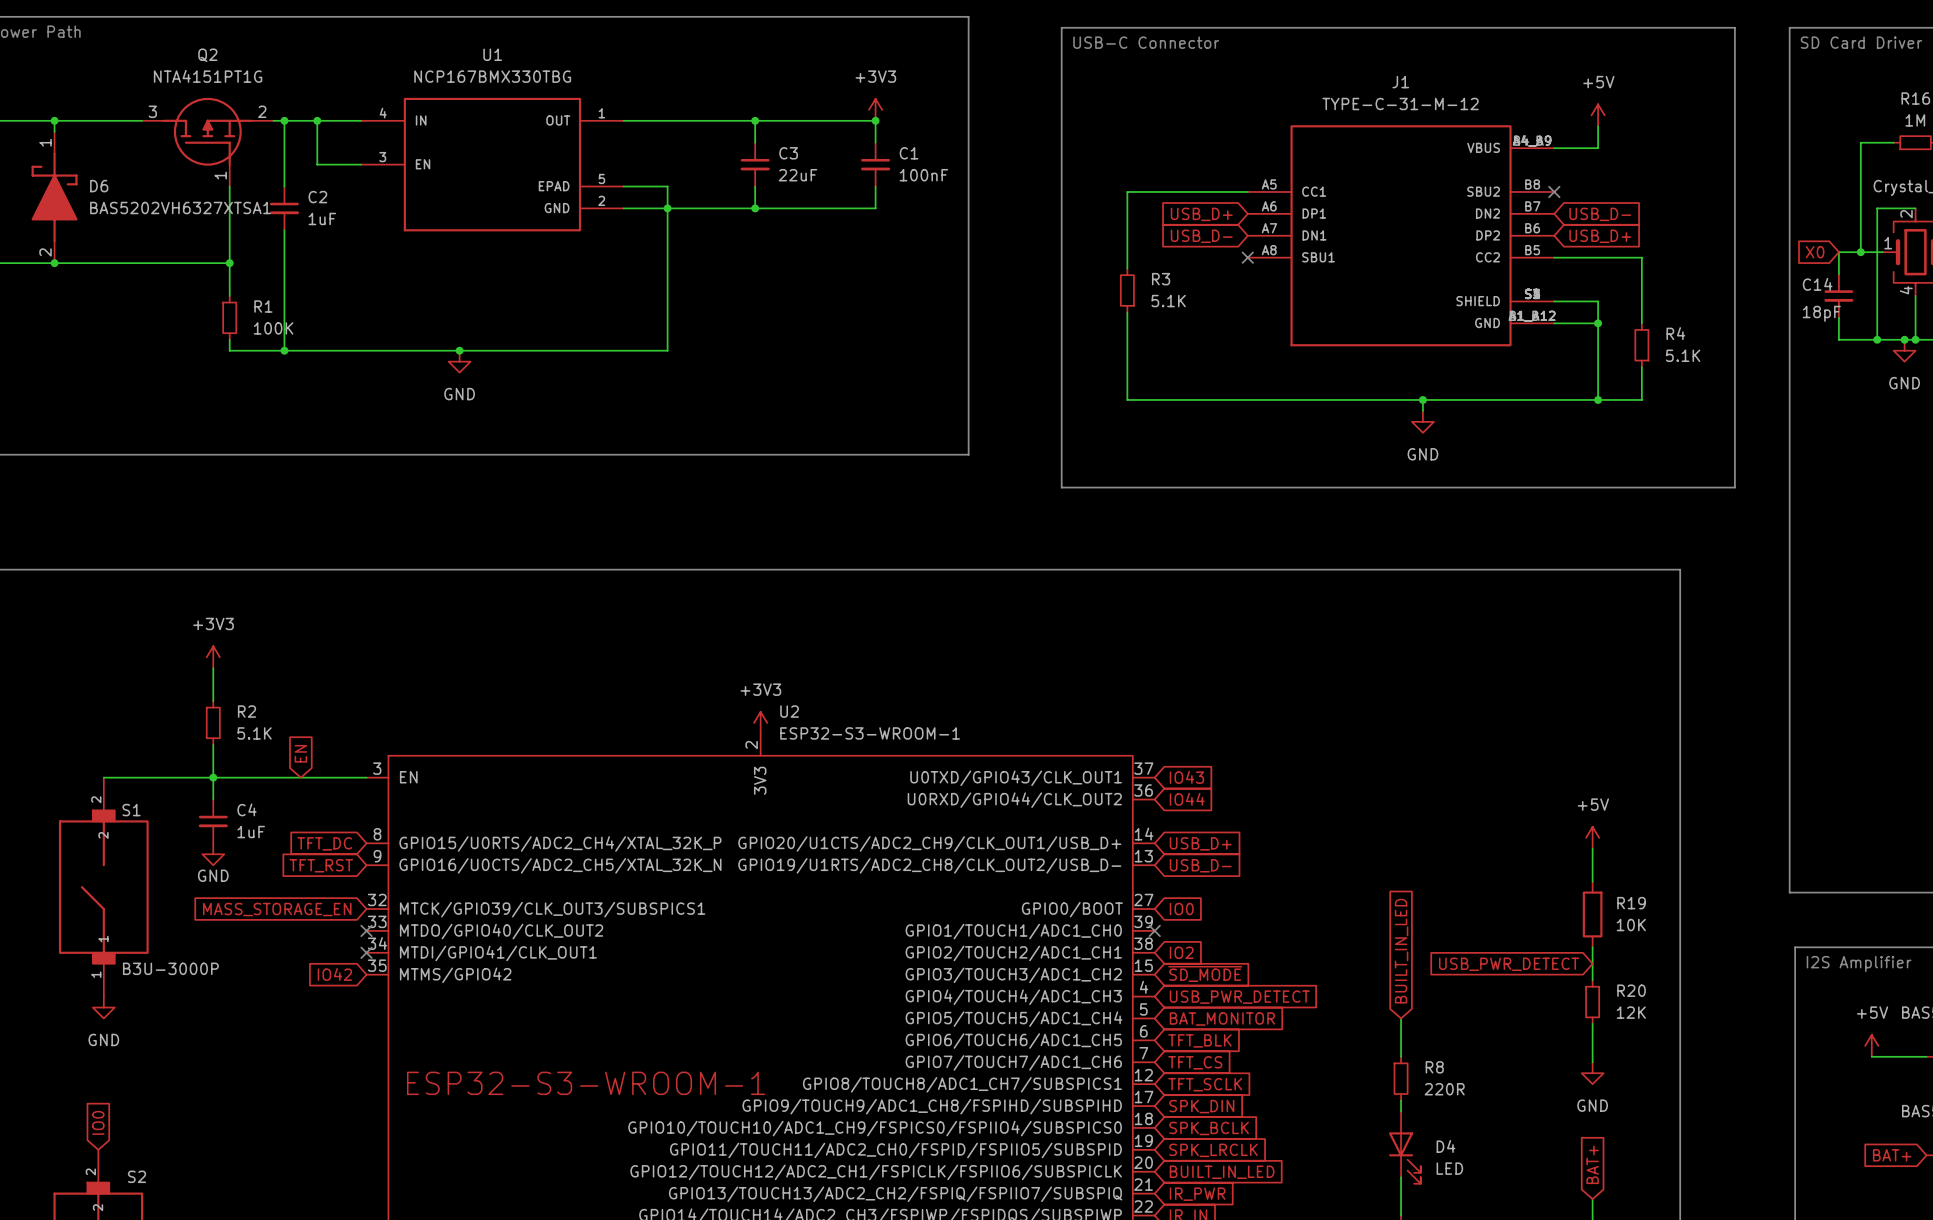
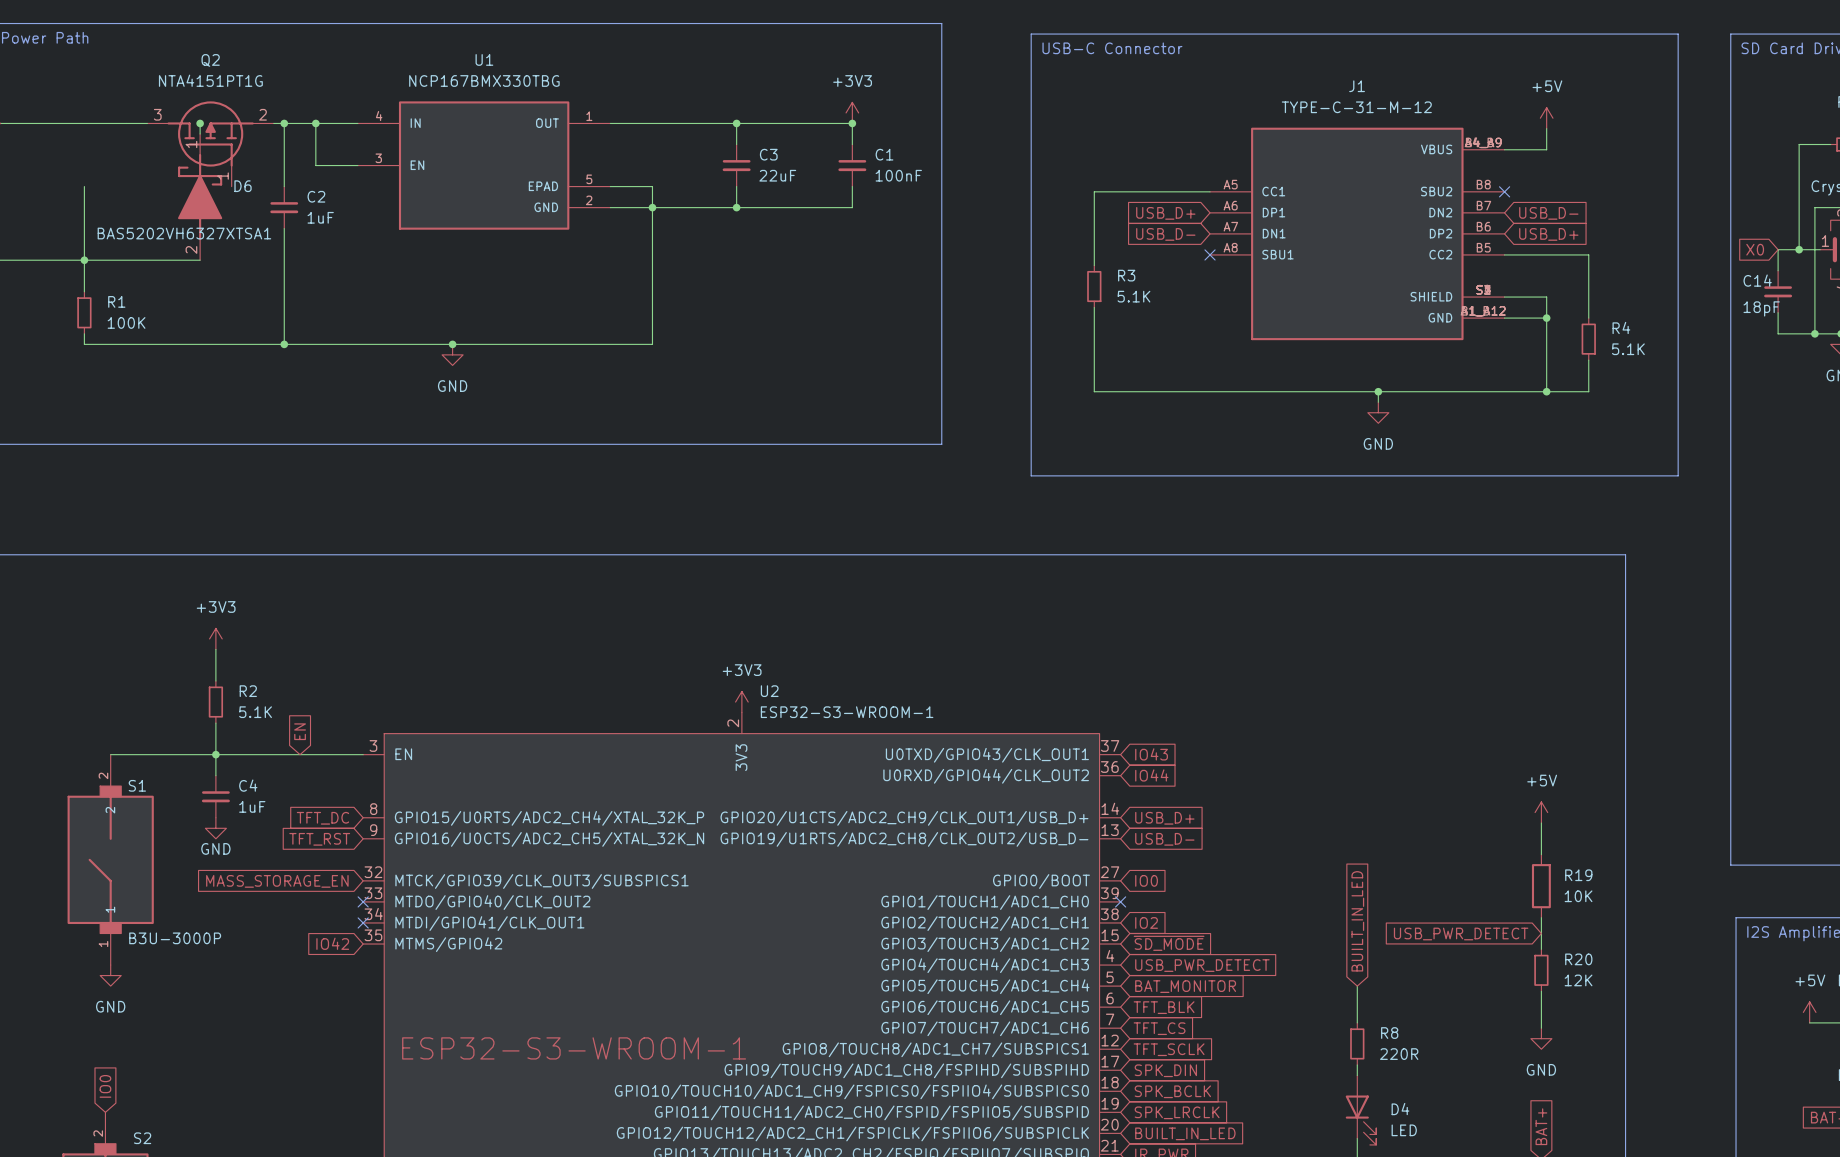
wire: (54, 120) (54, 131) -> (200, 123) (200, 133)
junction: (54, 120) -> none
junction: none -> (200, 123)
wire: (229, 186) (229, 295) -> (84, 186) (84, 291)
D6 position: (54, 197) -> (200, 197)
D6 value position: BAS5202VH6327XTSA1 (180, 207) -> BAS5202VH6327XTSA1 (184, 233)
junction position: (54, 263) -> (84, 260)
wire: (196, 263) (229, 263) -> none
junction: (229, 263) -> none
R1 position: (229, 317) -> (84, 312)
wire: (229, 339) (229, 350) -> (84, 333) (84, 344) (231, 344)

